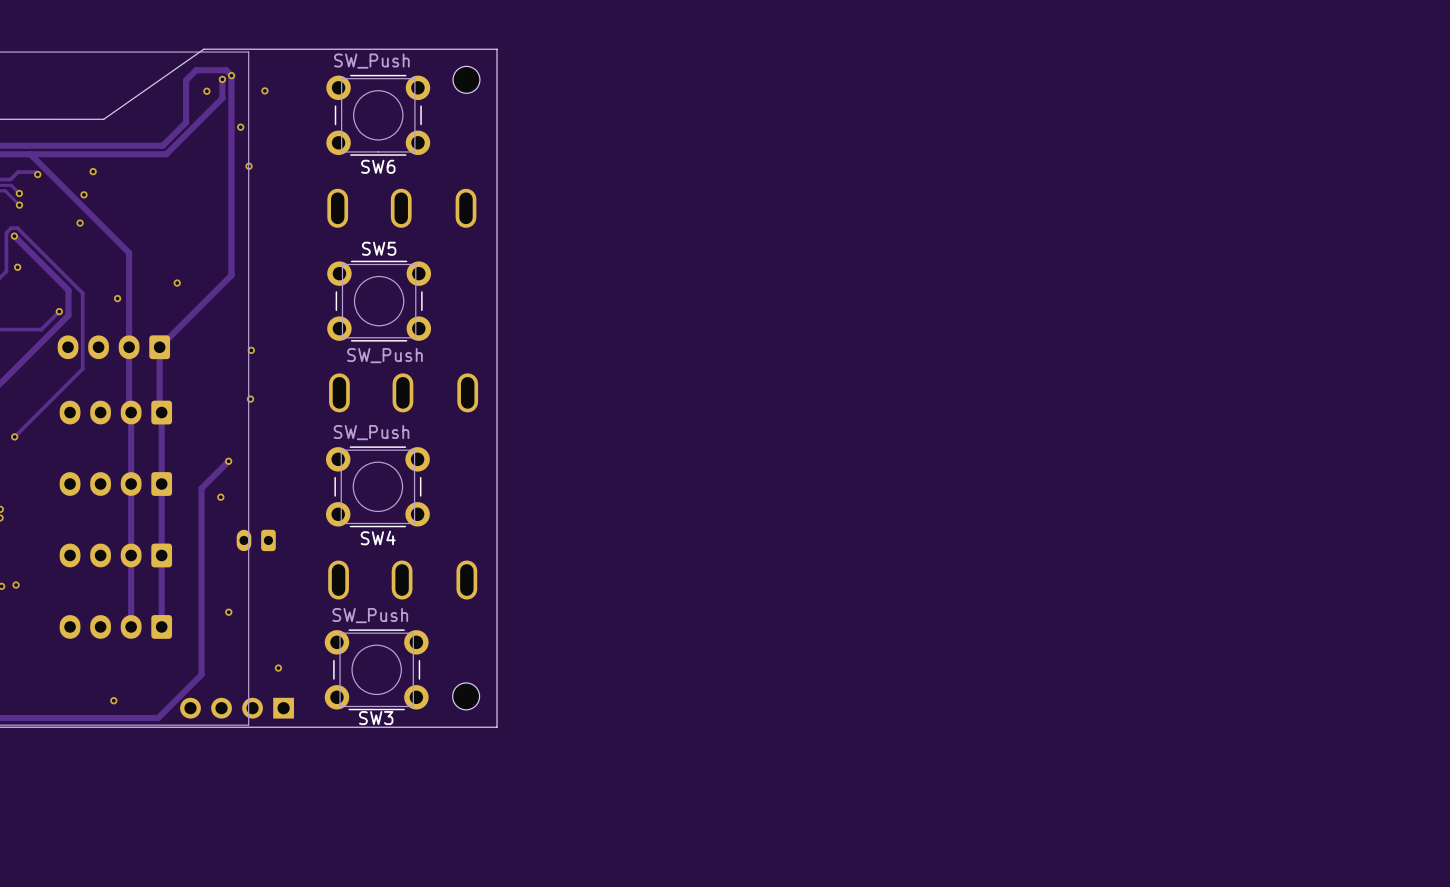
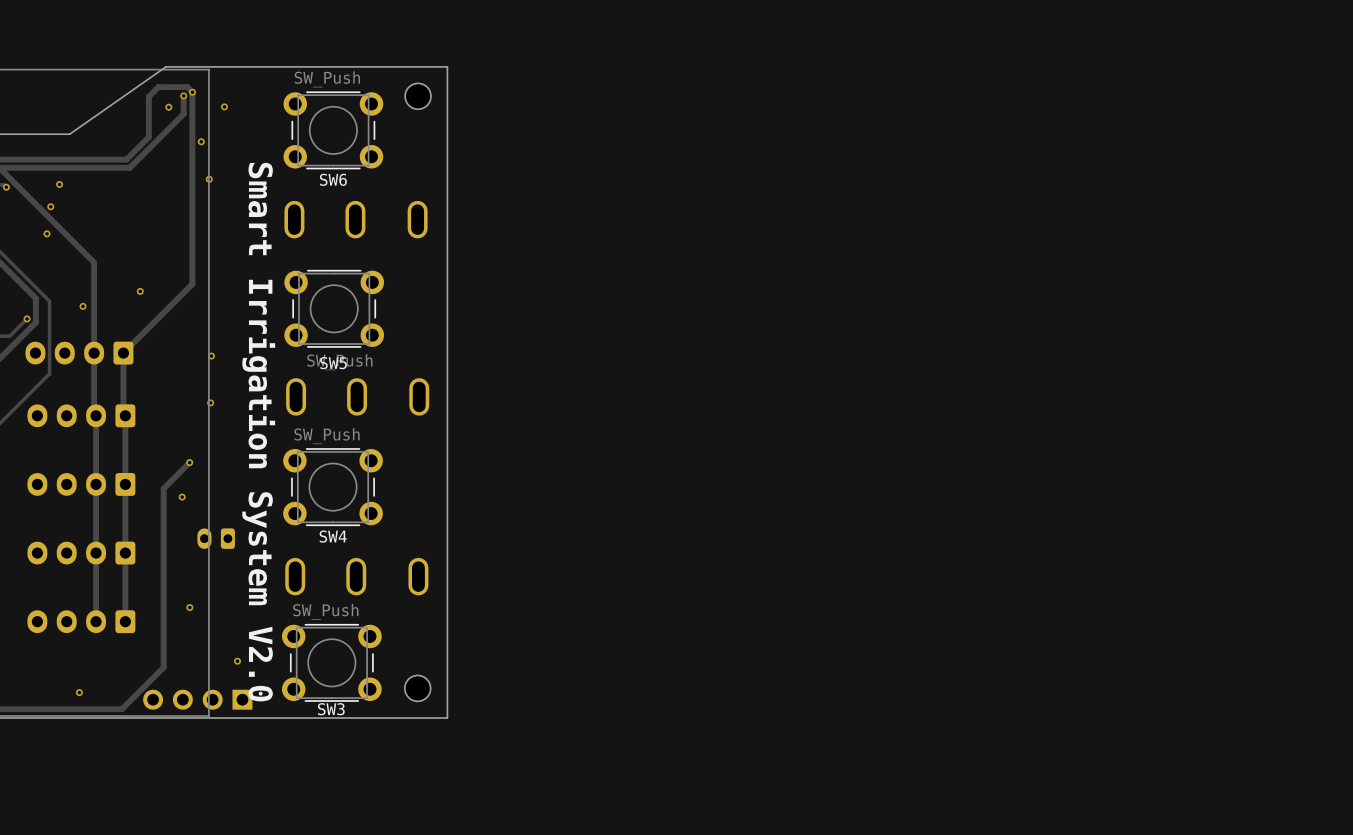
SW5 name position: SW5 (379, 248) -> SW5 (333, 363)
text: none -> Smart Irrigation System V2.0 (258, 432)

